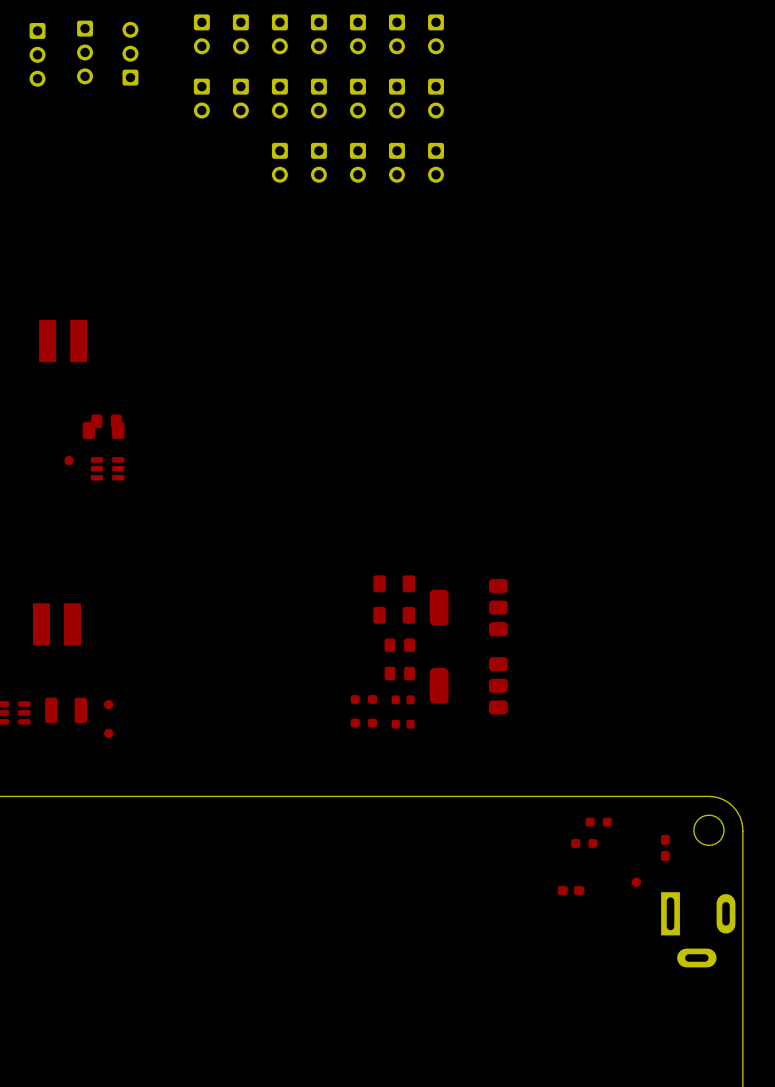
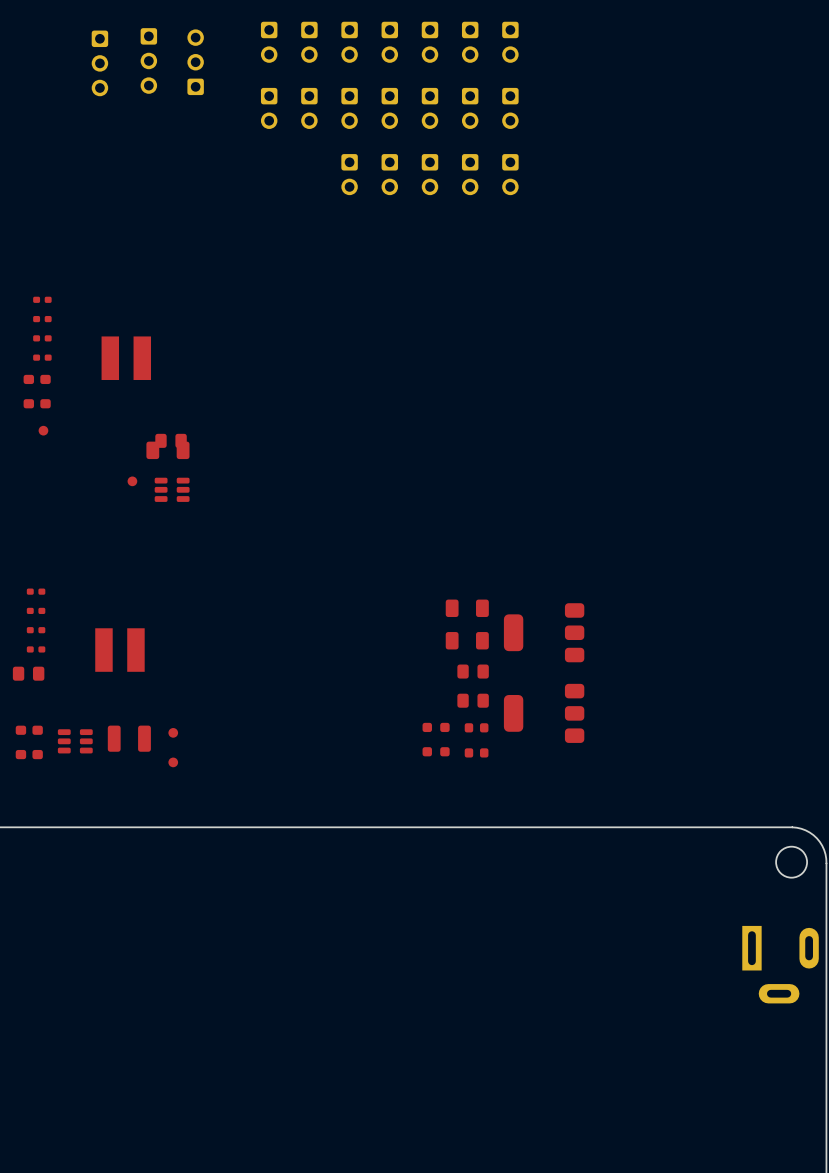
part: (598, 822) -> none
part: (584, 843) -> none
part: (665, 847) -> none
part: (636, 882) -> none
part: (570, 890) -> none

